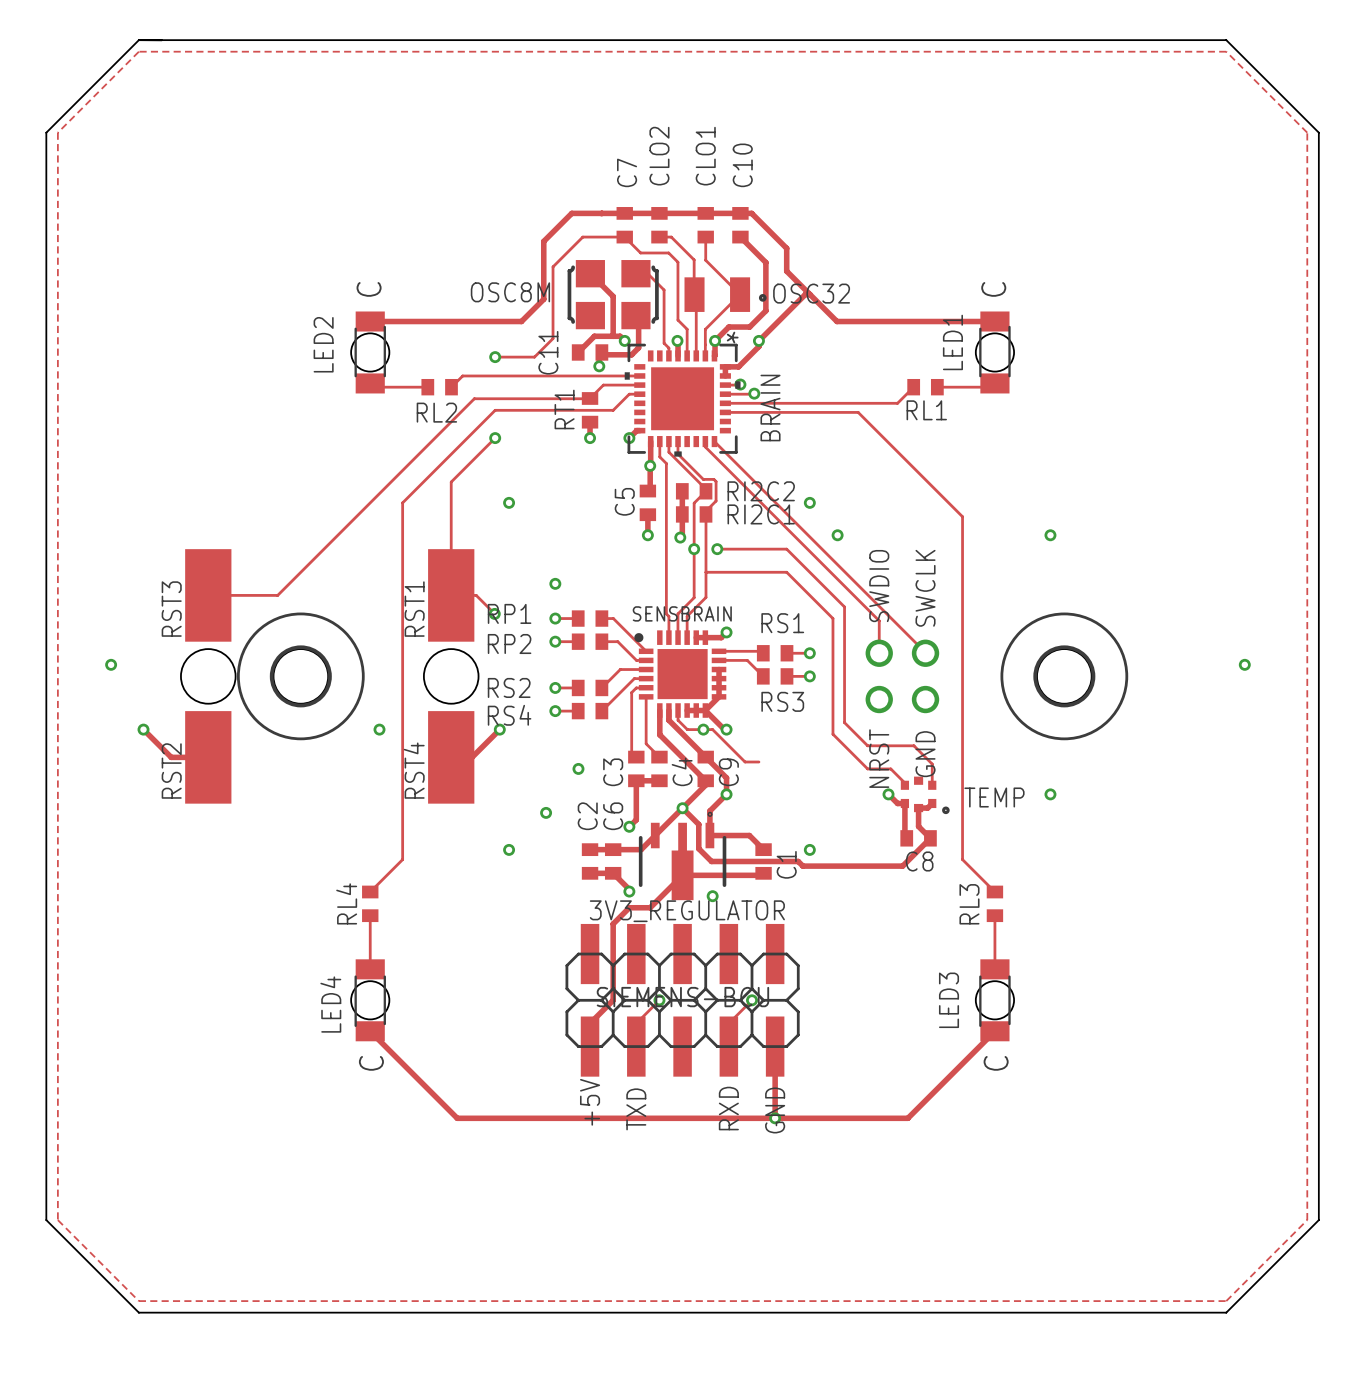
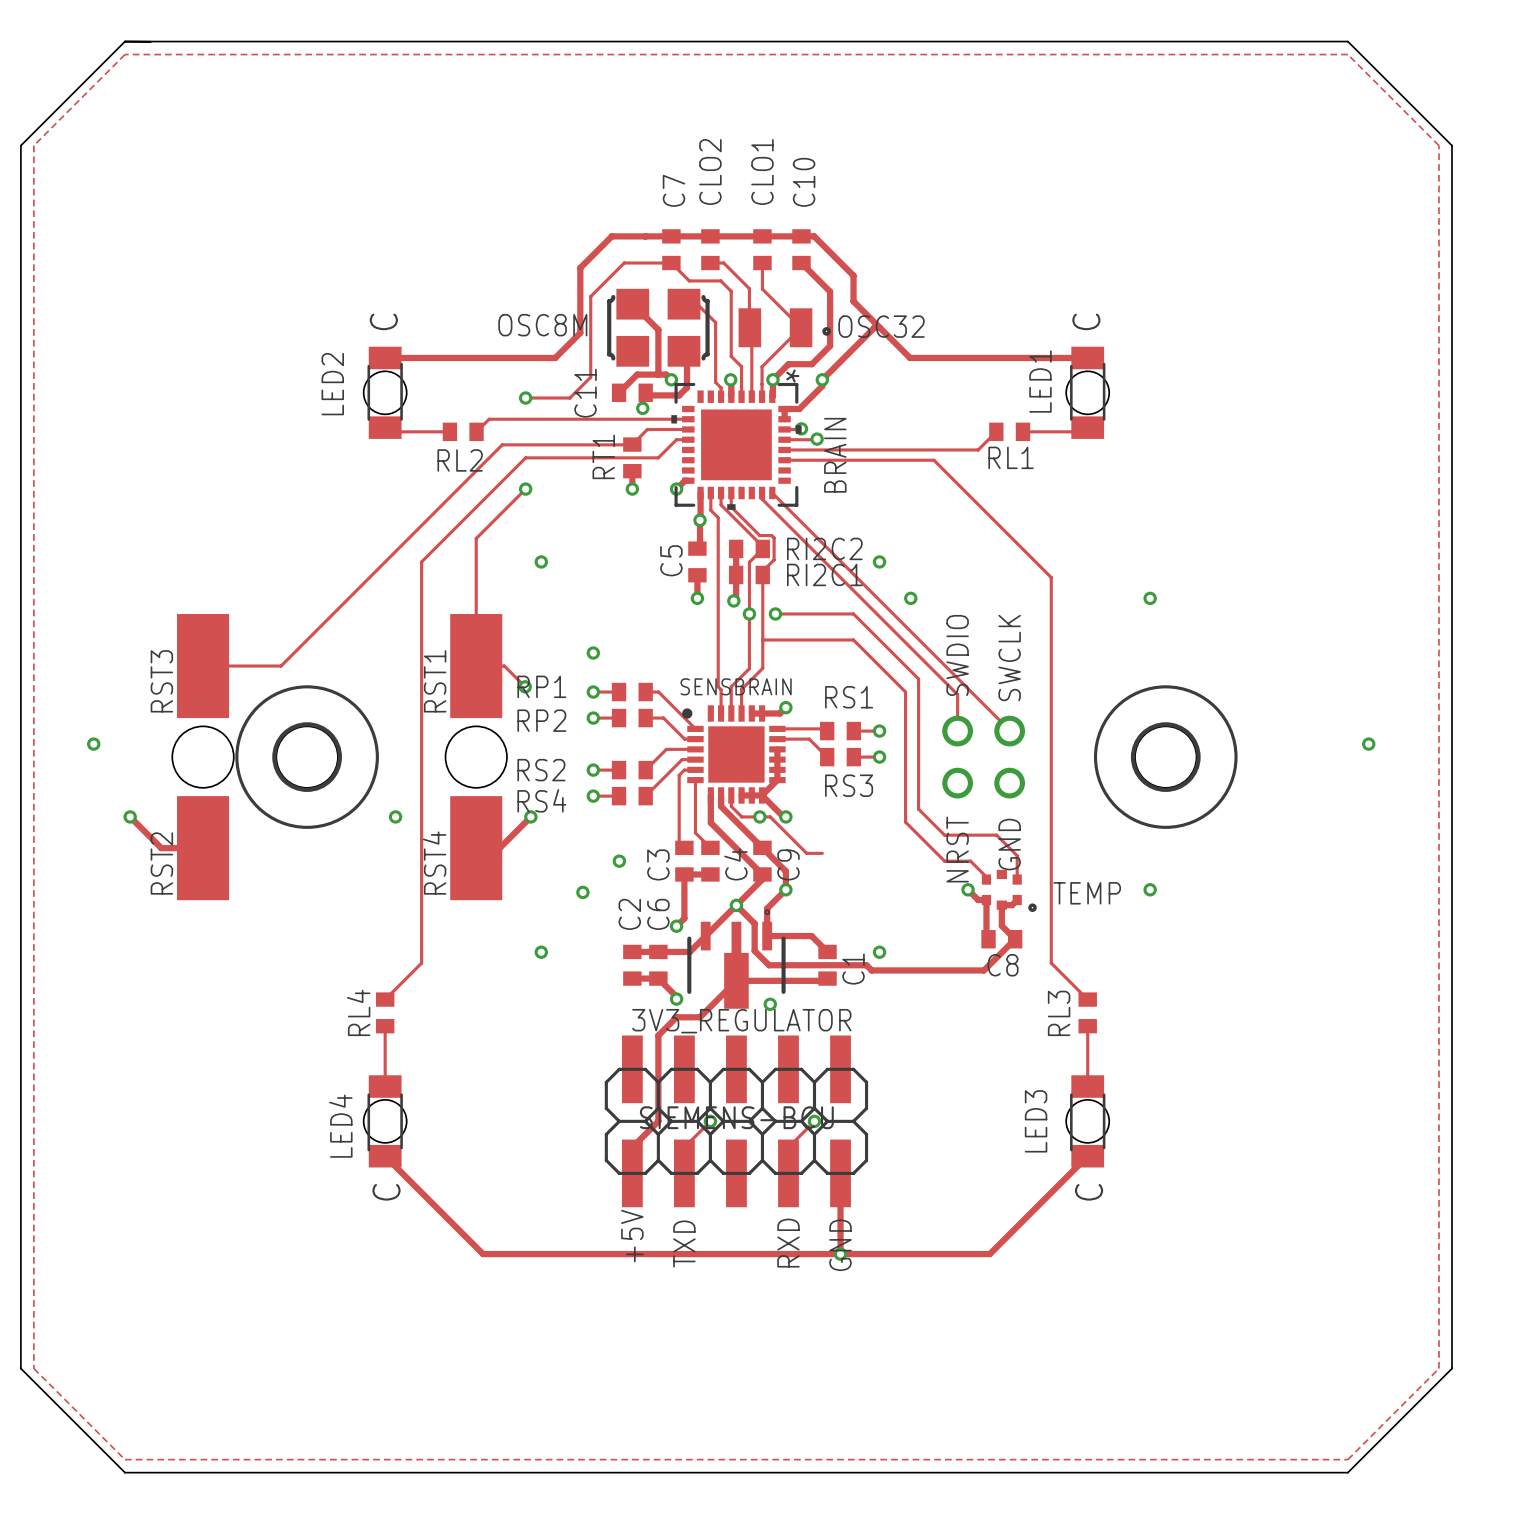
via position: (546, 812) -> (582, 892)

